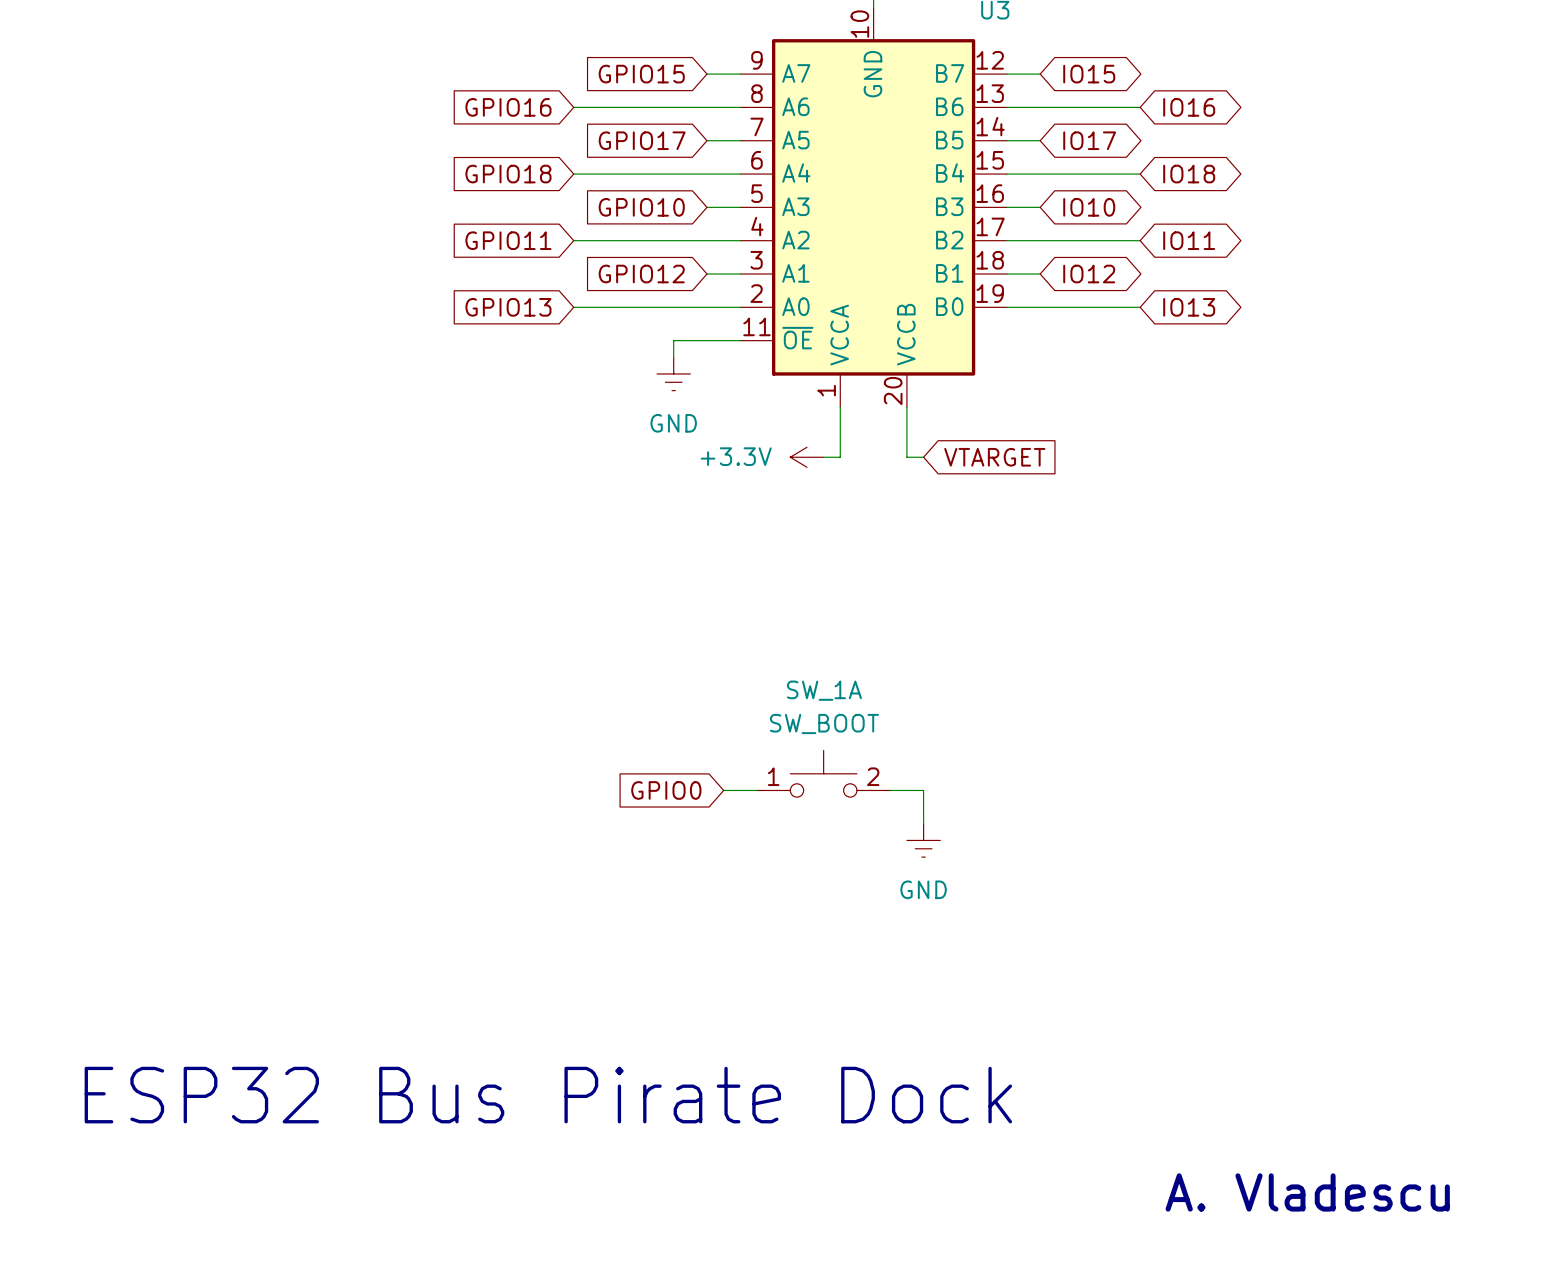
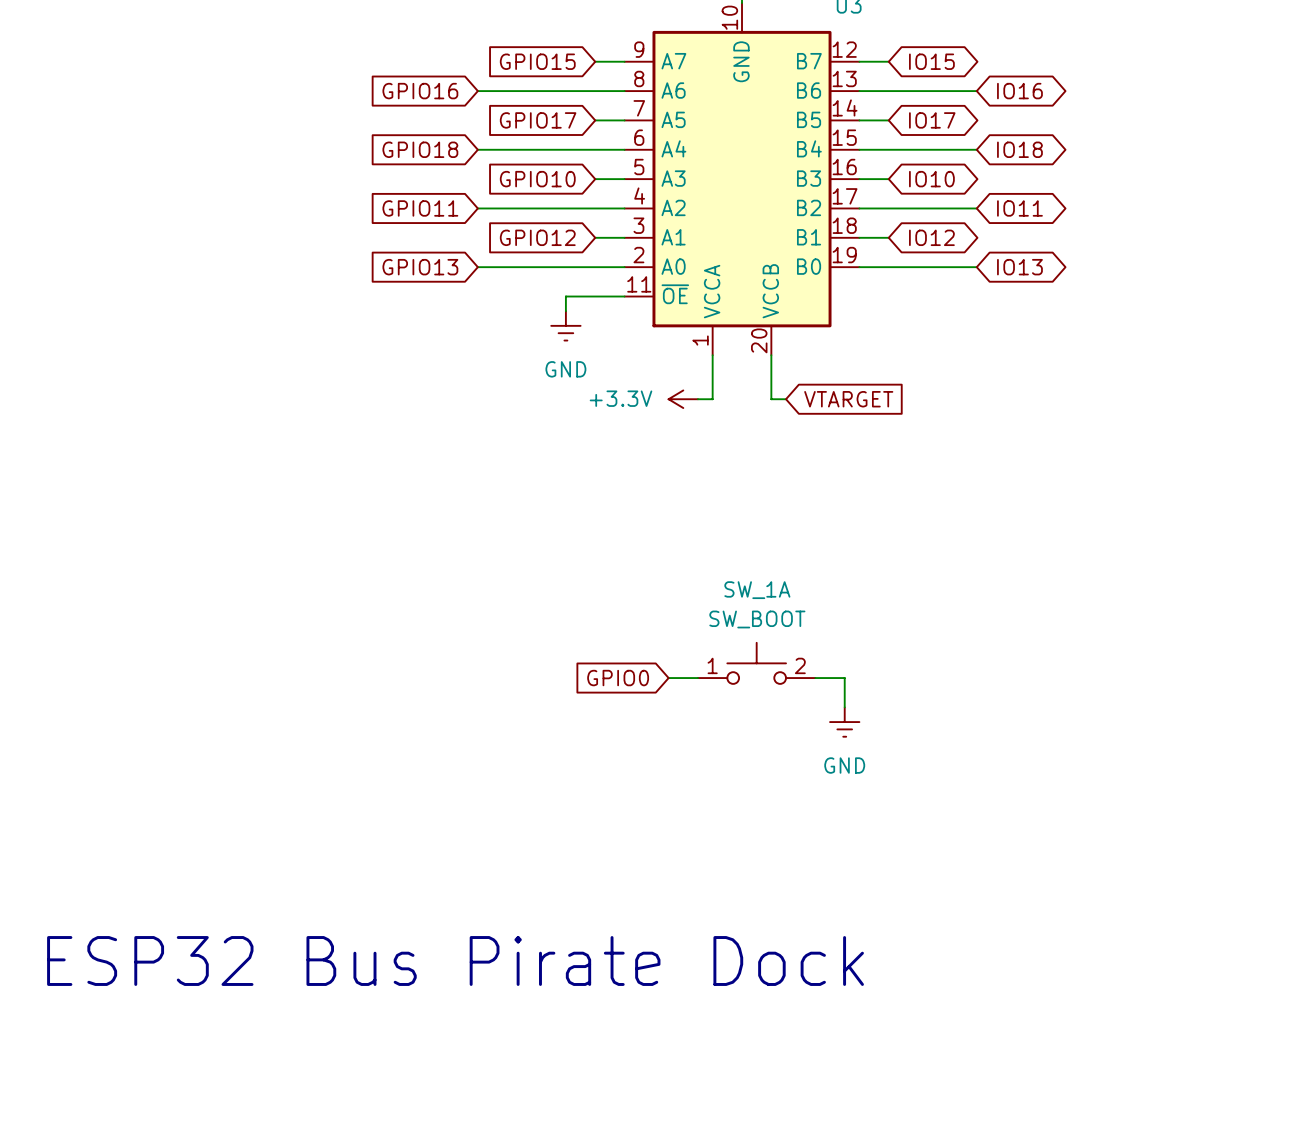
SW_1A position: (823, 773) -> (756, 663)
global label position: GPIO0 (666, 790) -> GPIO0 (618, 678)
wire: (890, 790) (923, 790) (923, 823) -> (815, 678) (844, 678) (844, 707)
power symbol position: GND (923, 840) -> GND (844, 722)
text: A. Vladescu (1307, 1192) -> none

